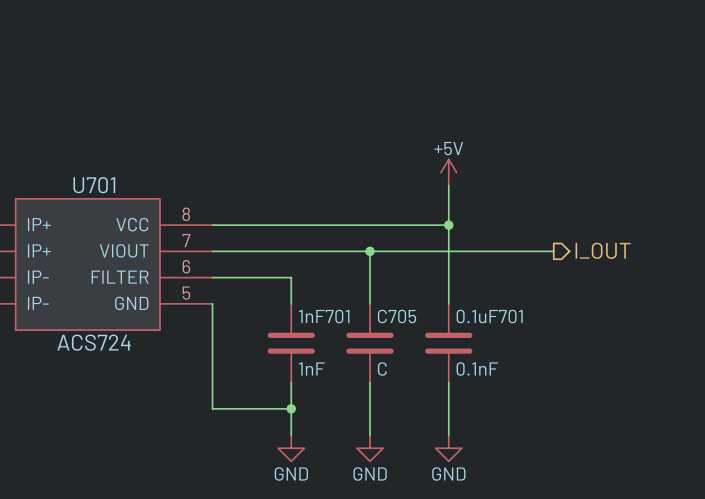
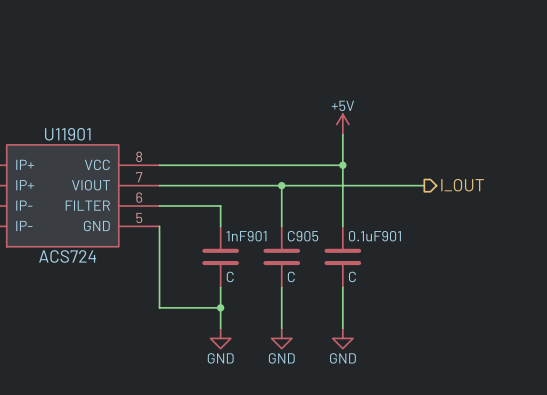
U701 name: U701 (94, 185) -> U11901 (67, 134)
1nF701 name: 1nF701 (324, 316) -> 1nF901 (246, 236)
C705 name: C705 (397, 316) -> C905 (303, 236)
0.1uF701 name: 0.1uF701 (489, 316) -> 0.1uF901 (374, 236)
1nF701 value: 1nF (311, 368) -> C (230, 276)
0.1uF701 value: 0.1nF (477, 369) -> C (352, 276)

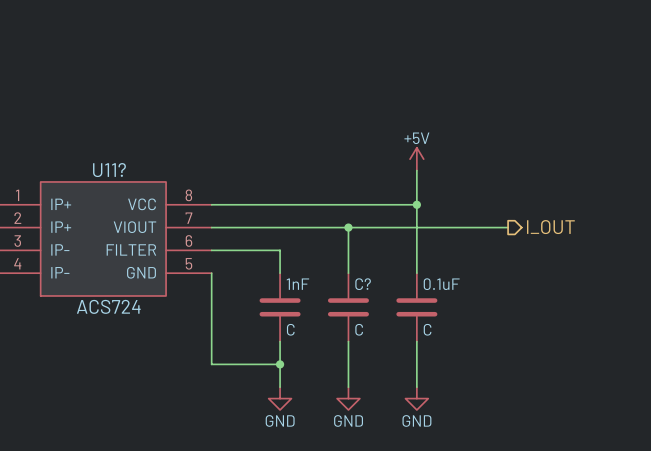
U11901 name: U11901 (67, 134) -> U11? (109, 170)
1nF901 name: 1nF901 (246, 236) -> 1nF (297, 284)
C905 name: C905 (303, 236) -> C? (363, 284)
0.1uF901 name: 0.1uF901 (374, 236) -> 0.1uF (441, 284)

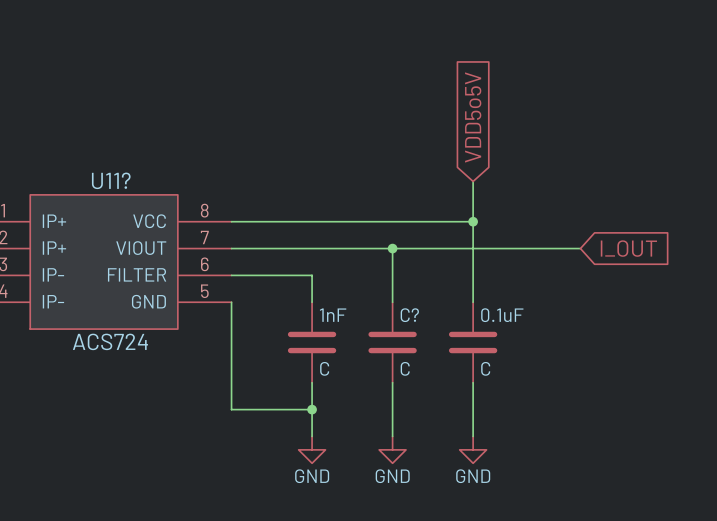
global label: none -> VDD5o5V (473, 117)
power symbol: +5V (416, 159) -> none
global label: none -> I_OUT (628, 248)
hierarchical label: I_OUT (550, 227) -> none

